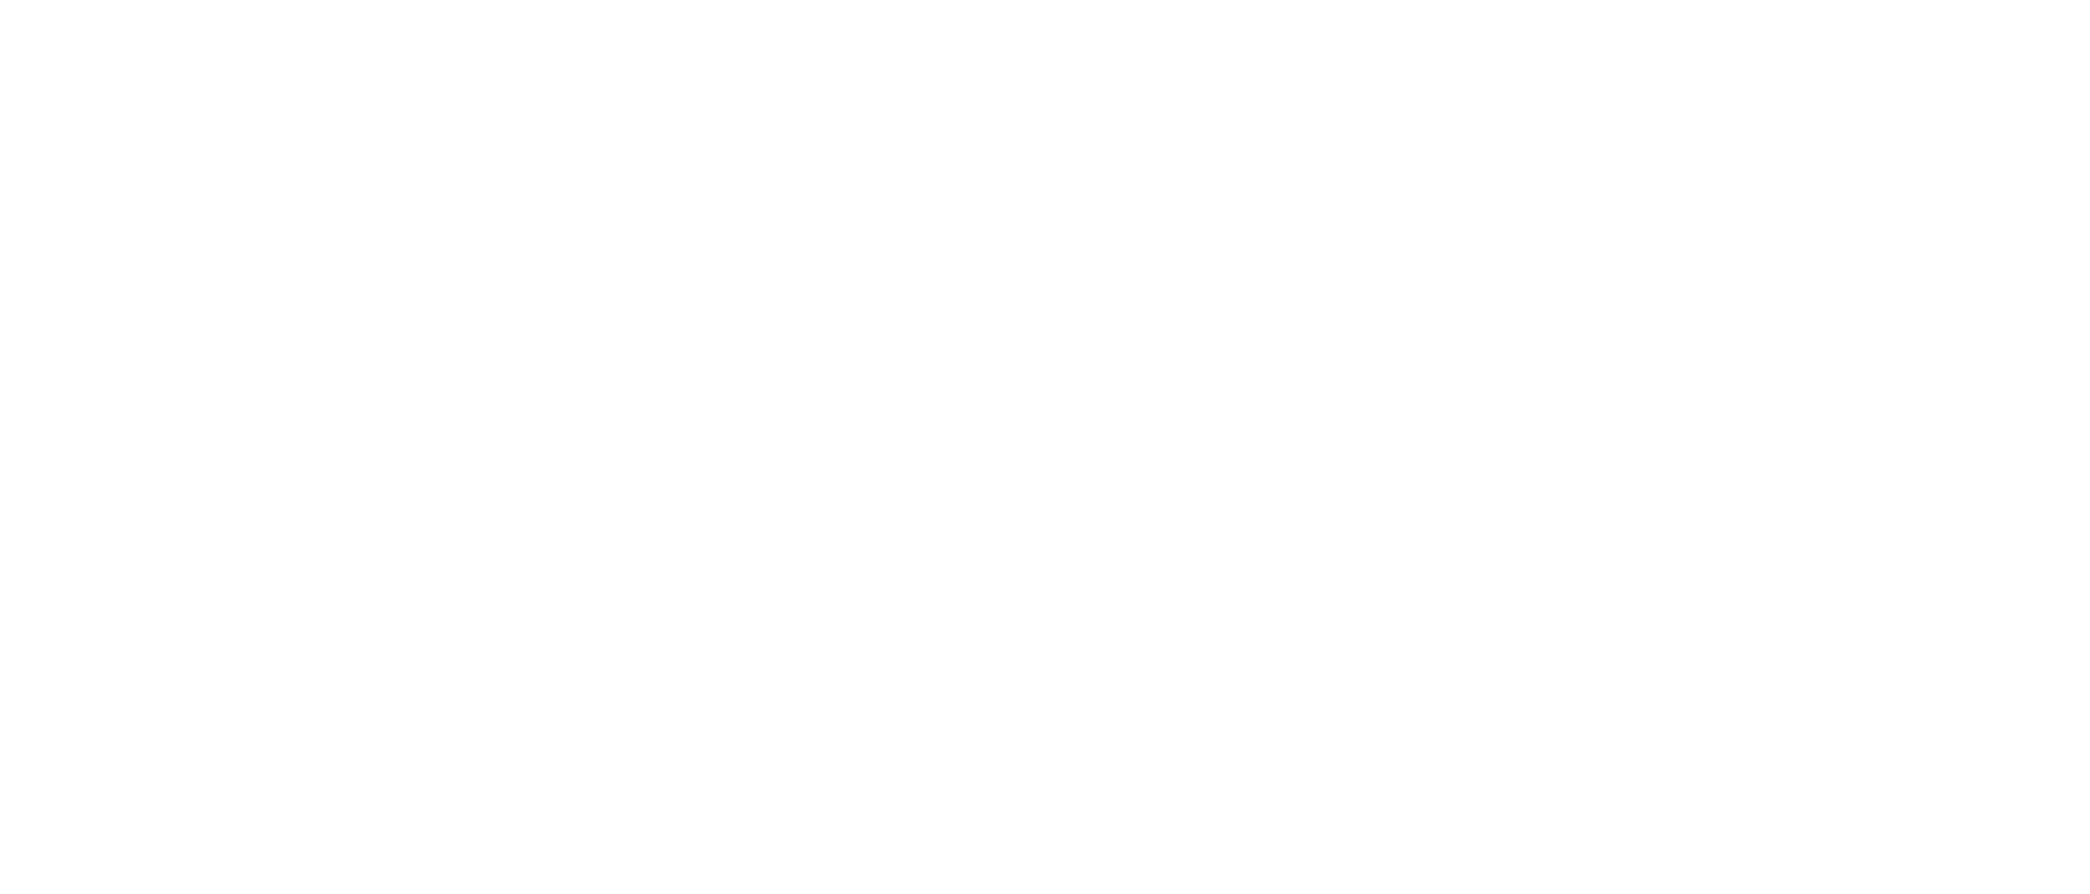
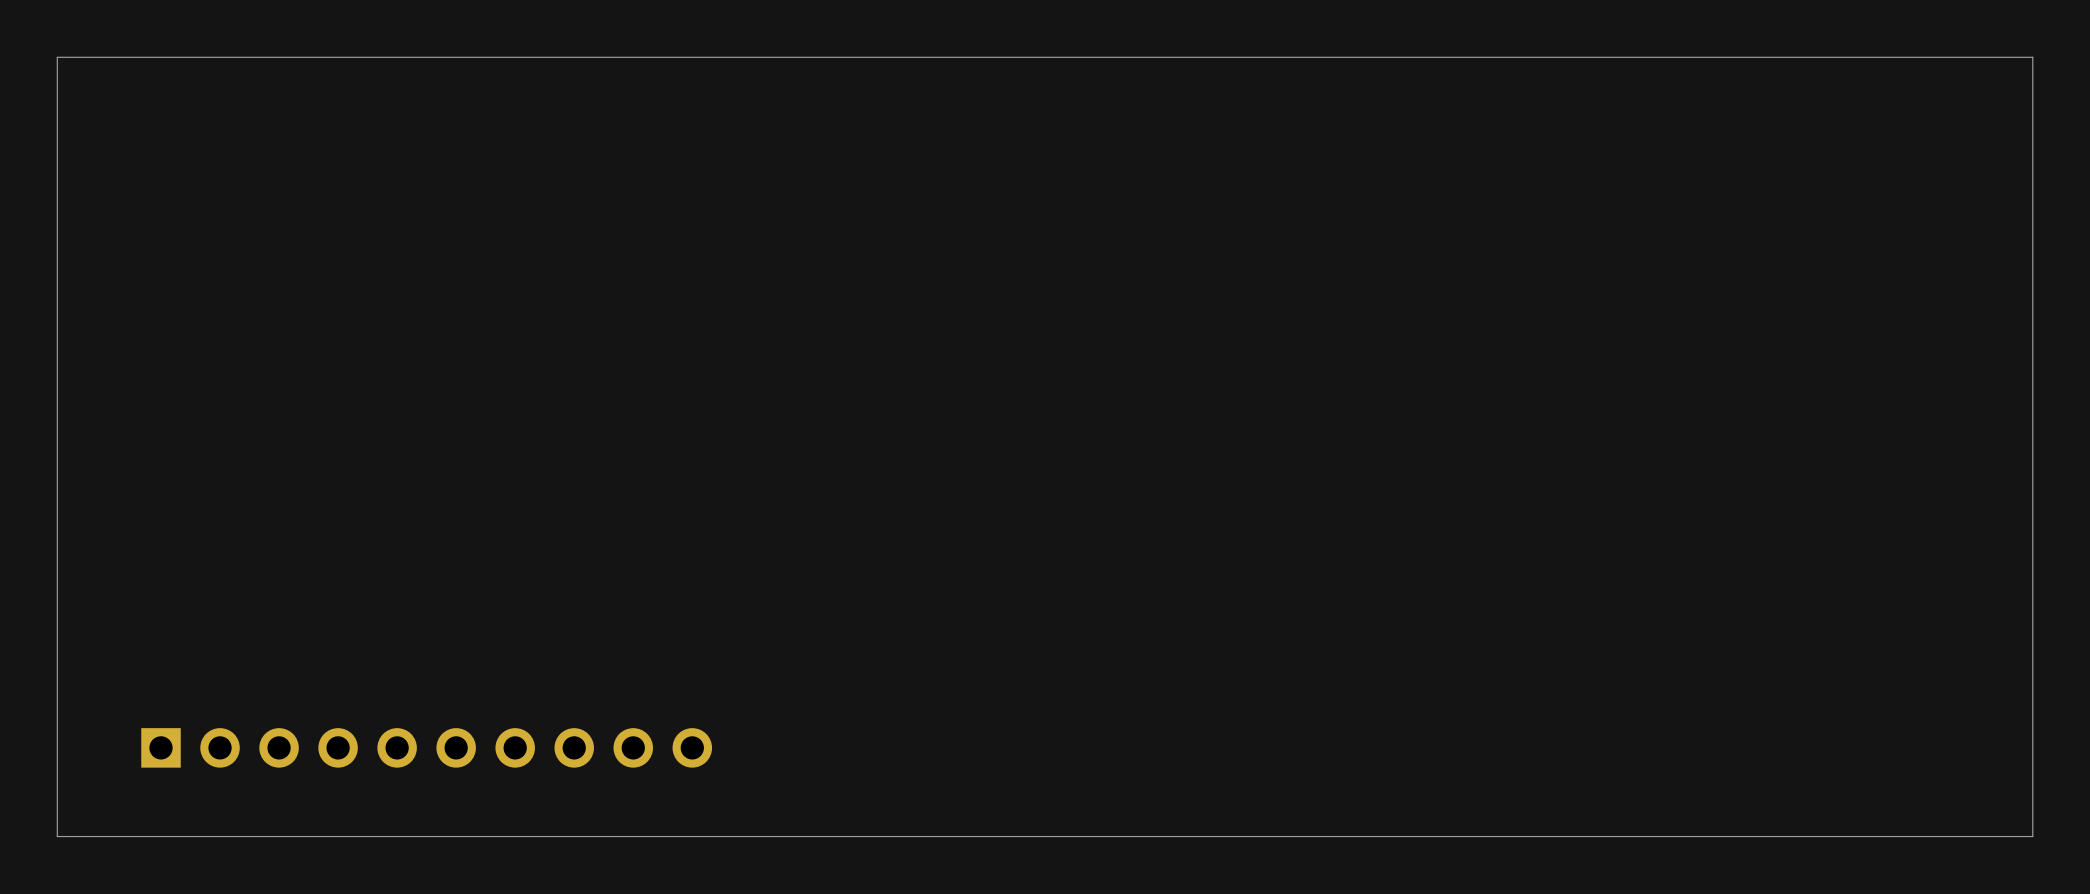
board edge: none -> (2032, 57) (2032, 836) (57, 836) (57, 57) (2032, 57)
part: none -> (426, 747)

